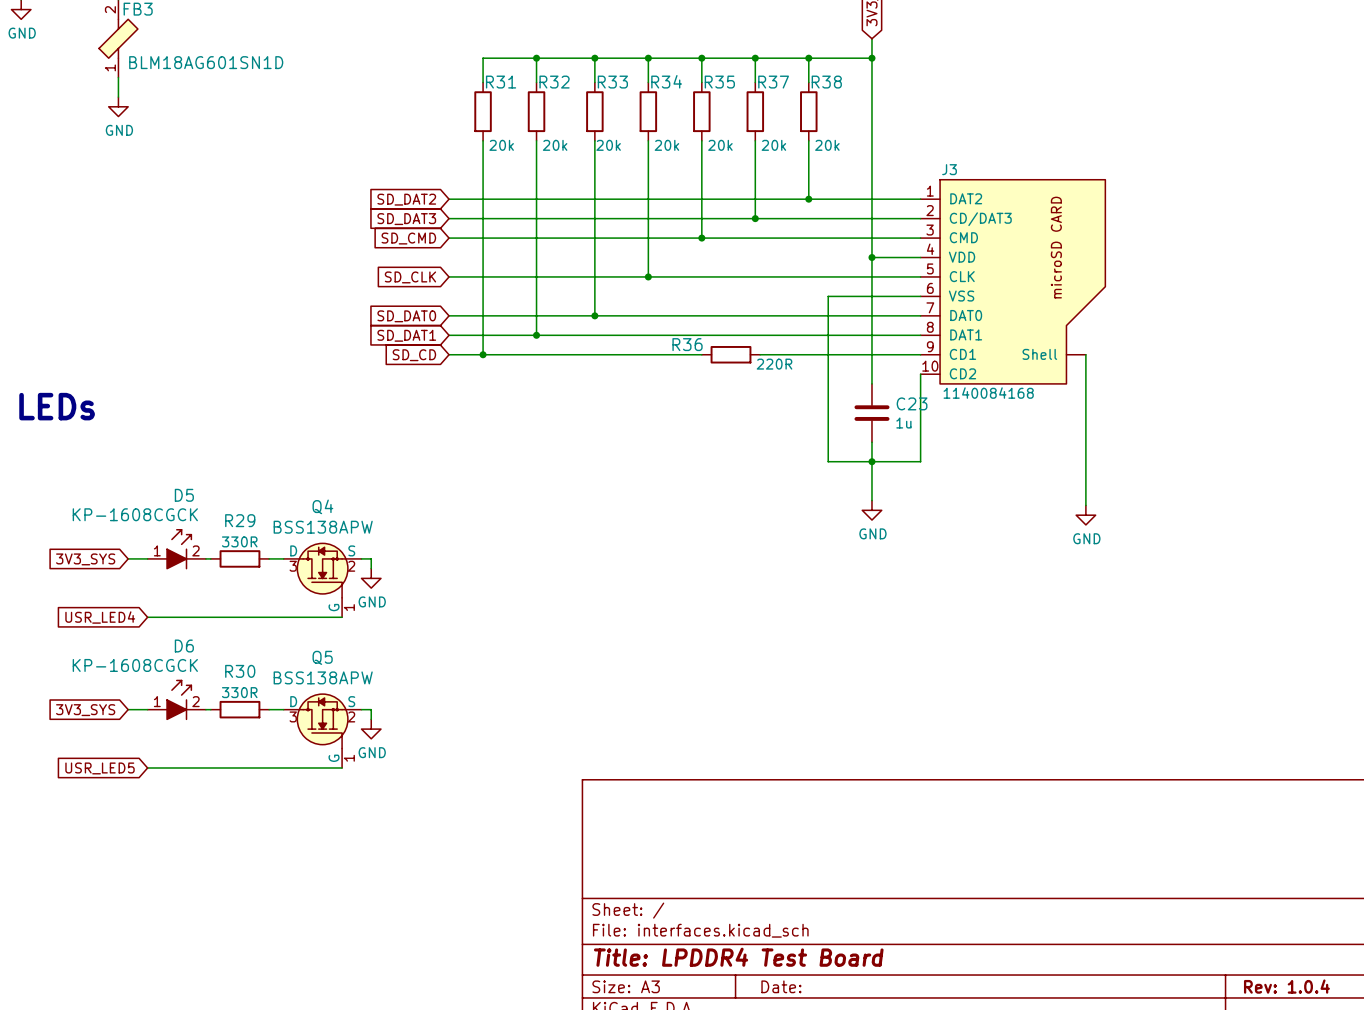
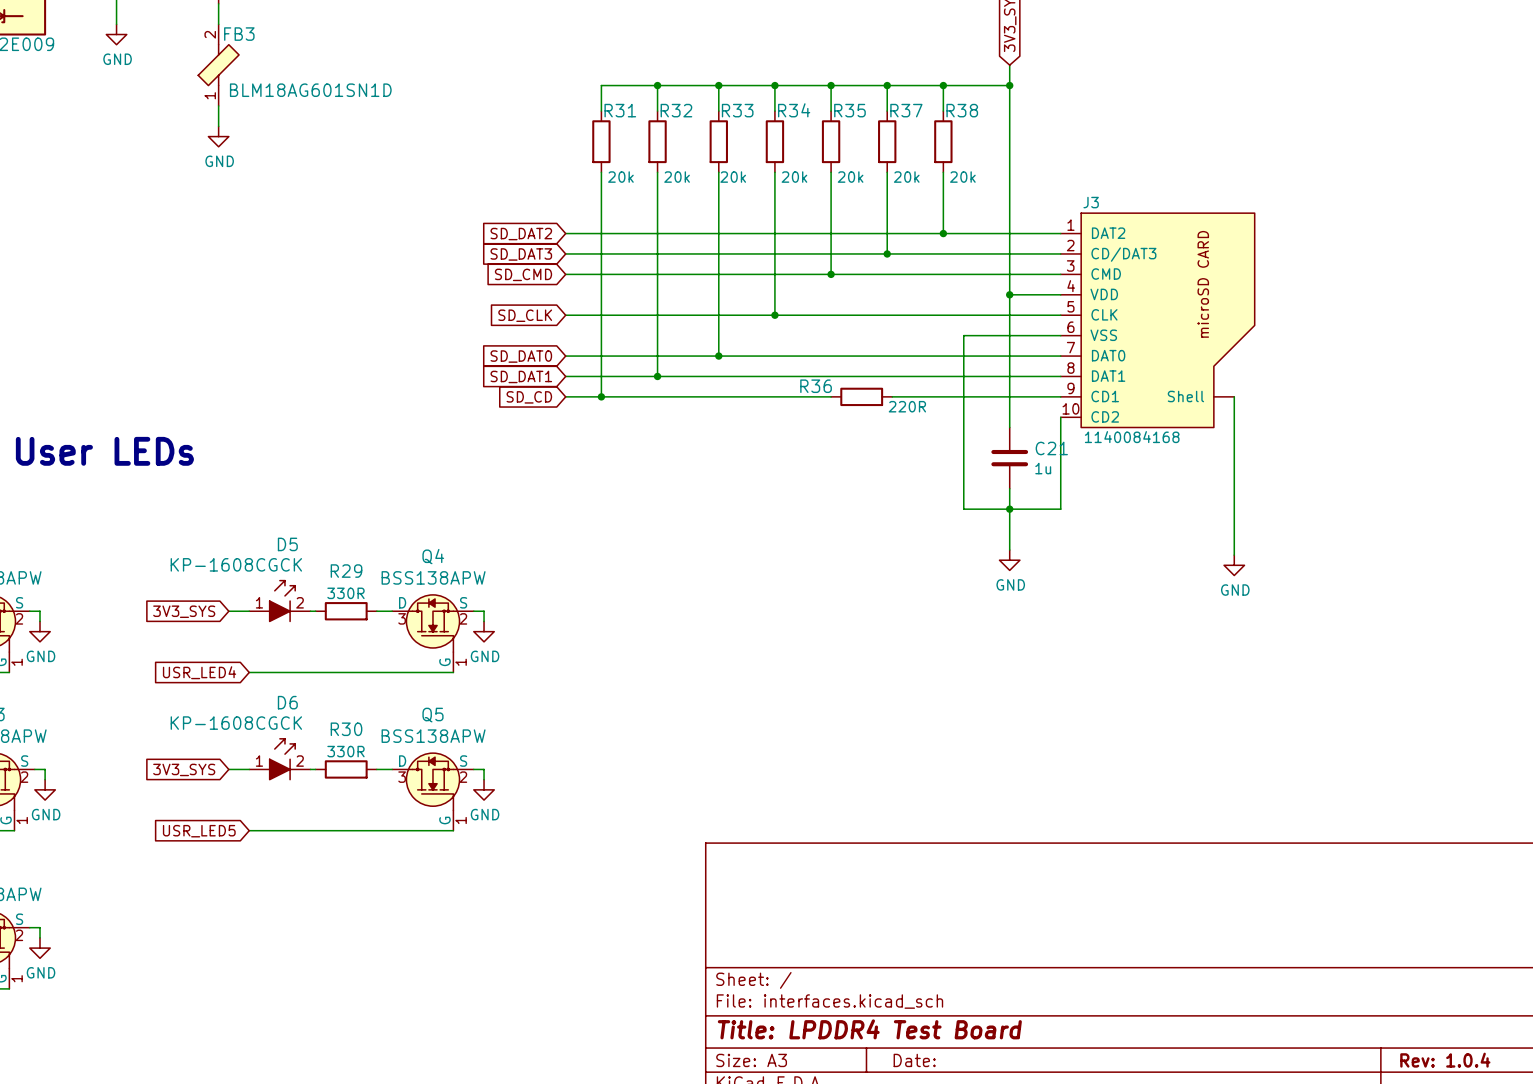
C23 name: C23 (912, 403) -> C21 (1051, 448)

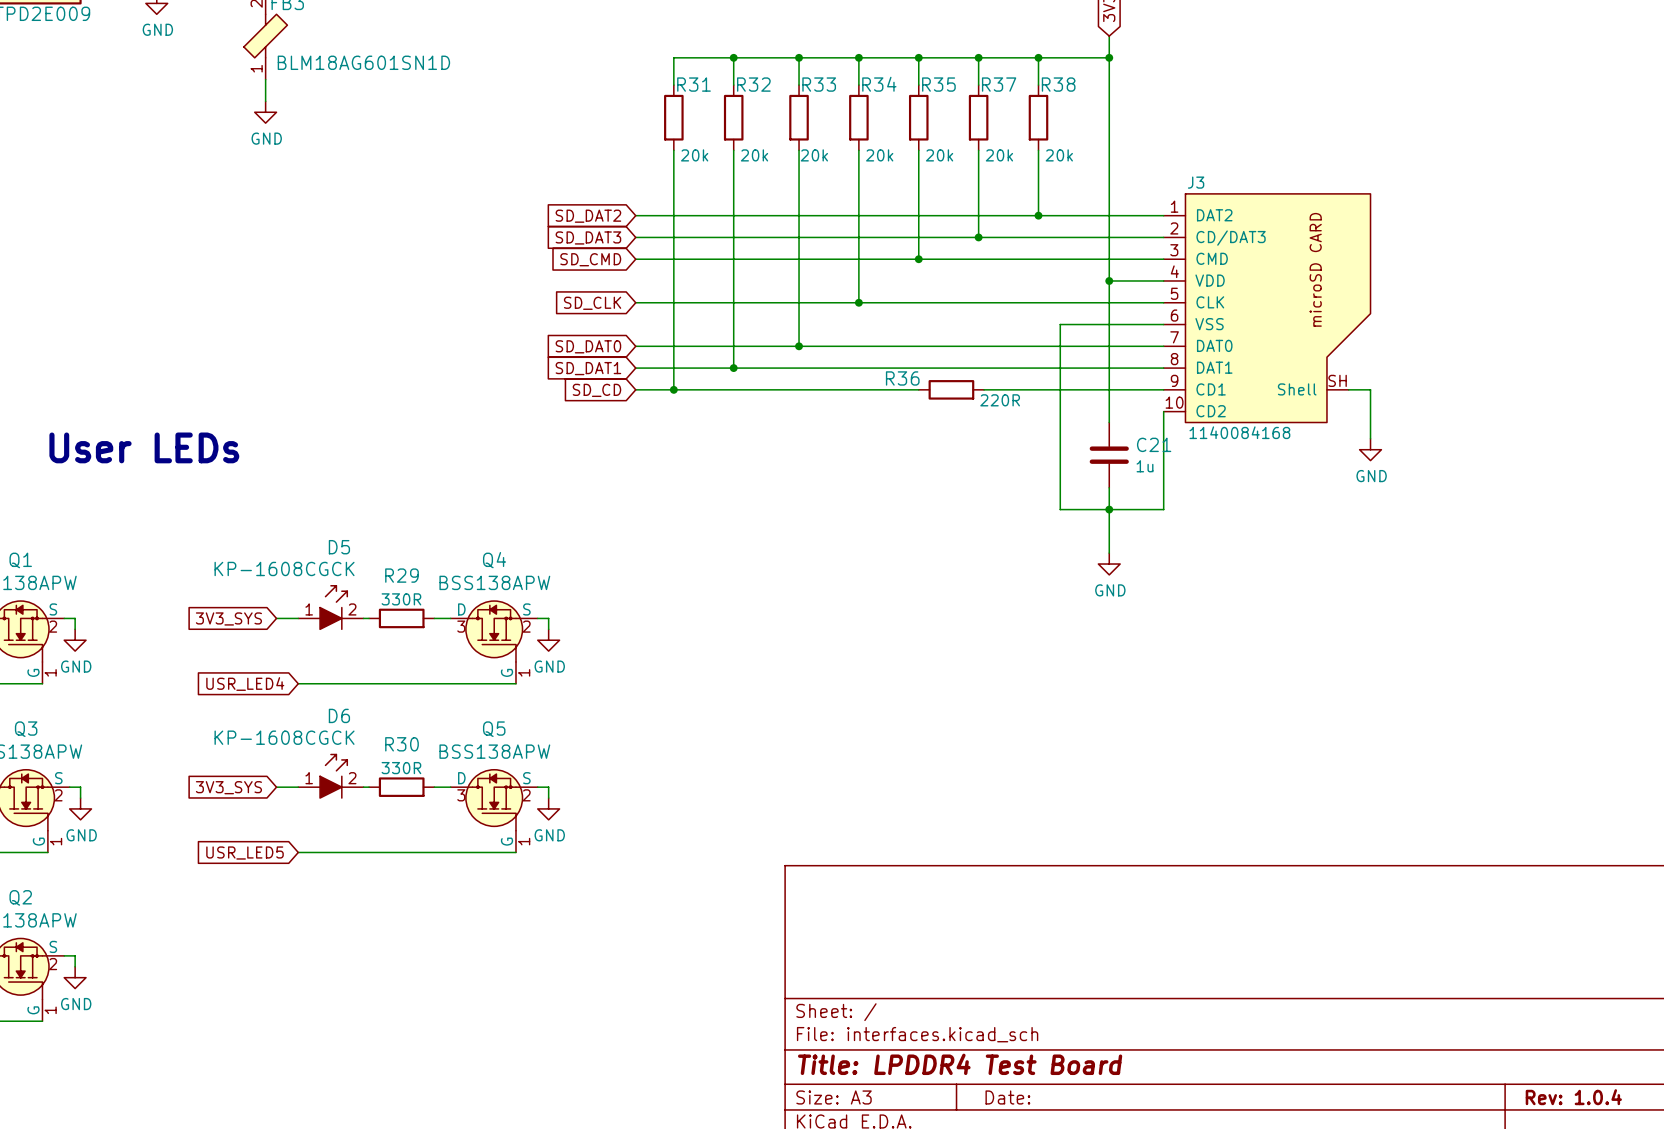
J3 pin number: none -> SH (1337, 380)
wire: (1234, 396) (1234, 555) -> (1348, 389) (1370, 389) (1370, 438)
power symbol position: GND (1234, 565) -> GND (1370, 449)

